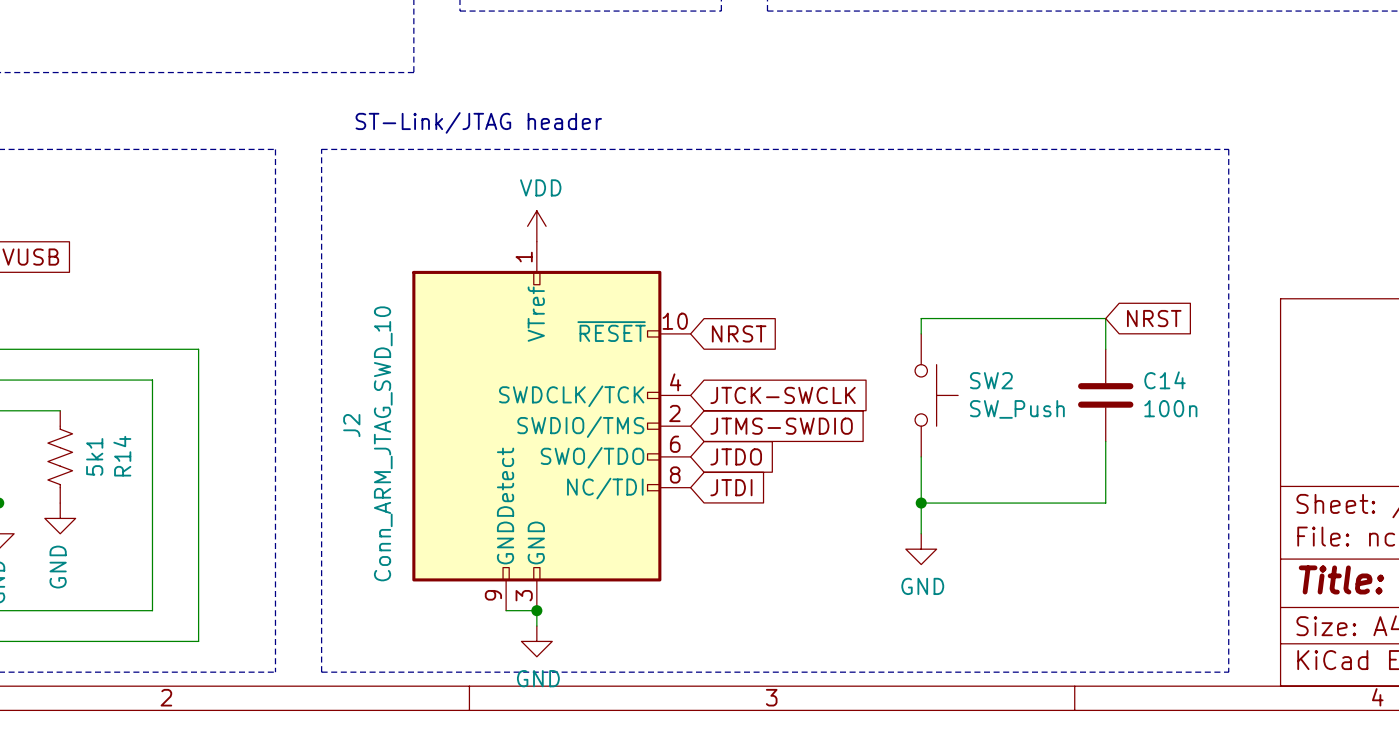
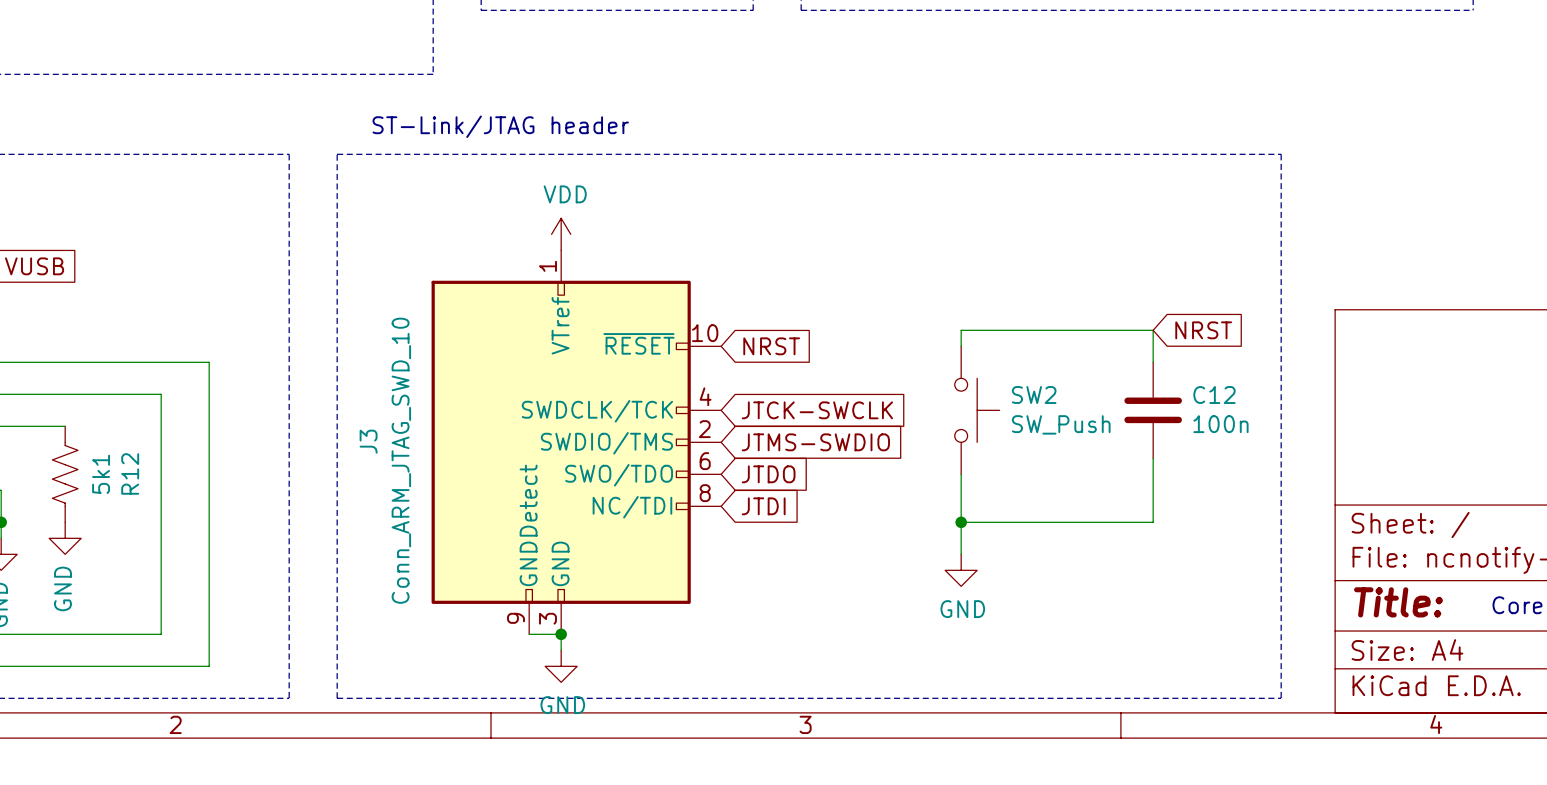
C14 name: C14 (1165, 380) -> C12 (1214, 395)
J2 name: J2 (351, 425) -> J3 (368, 441)
R14 name: R14 (122, 456) -> R12 (130, 473)

